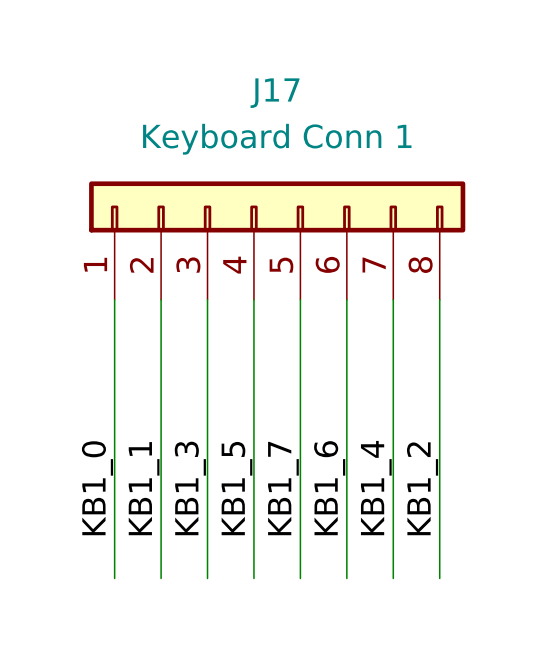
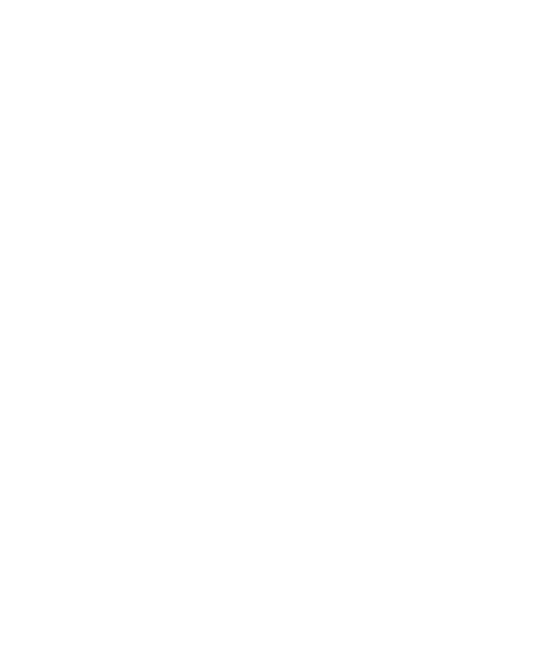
J17: Keyboard Conn 1 (277, 240) -> none
wire: (114, 299) (114, 578) -> none
wire: (161, 299) (161, 578) -> none
wire: (207, 299) (207, 578) -> none
wire: (253, 299) (253, 578) -> none
wire: (300, 299) (300, 578) -> none
wire: (346, 299) (346, 578) -> none
wire: (393, 299) (393, 578) -> none
wire: (439, 299) (439, 578) -> none
label: KB1_0 (97, 488) -> none
label: KB1_1 (144, 488) -> none
label: KB1_3 (190, 488) -> none
label: KB1_5 (237, 488) -> none
label: KB1_7 (283, 488) -> none
label: KB1_6 (329, 488) -> none
label: KB1_4 (376, 488) -> none
label: KB1_2 (422, 488) -> none

